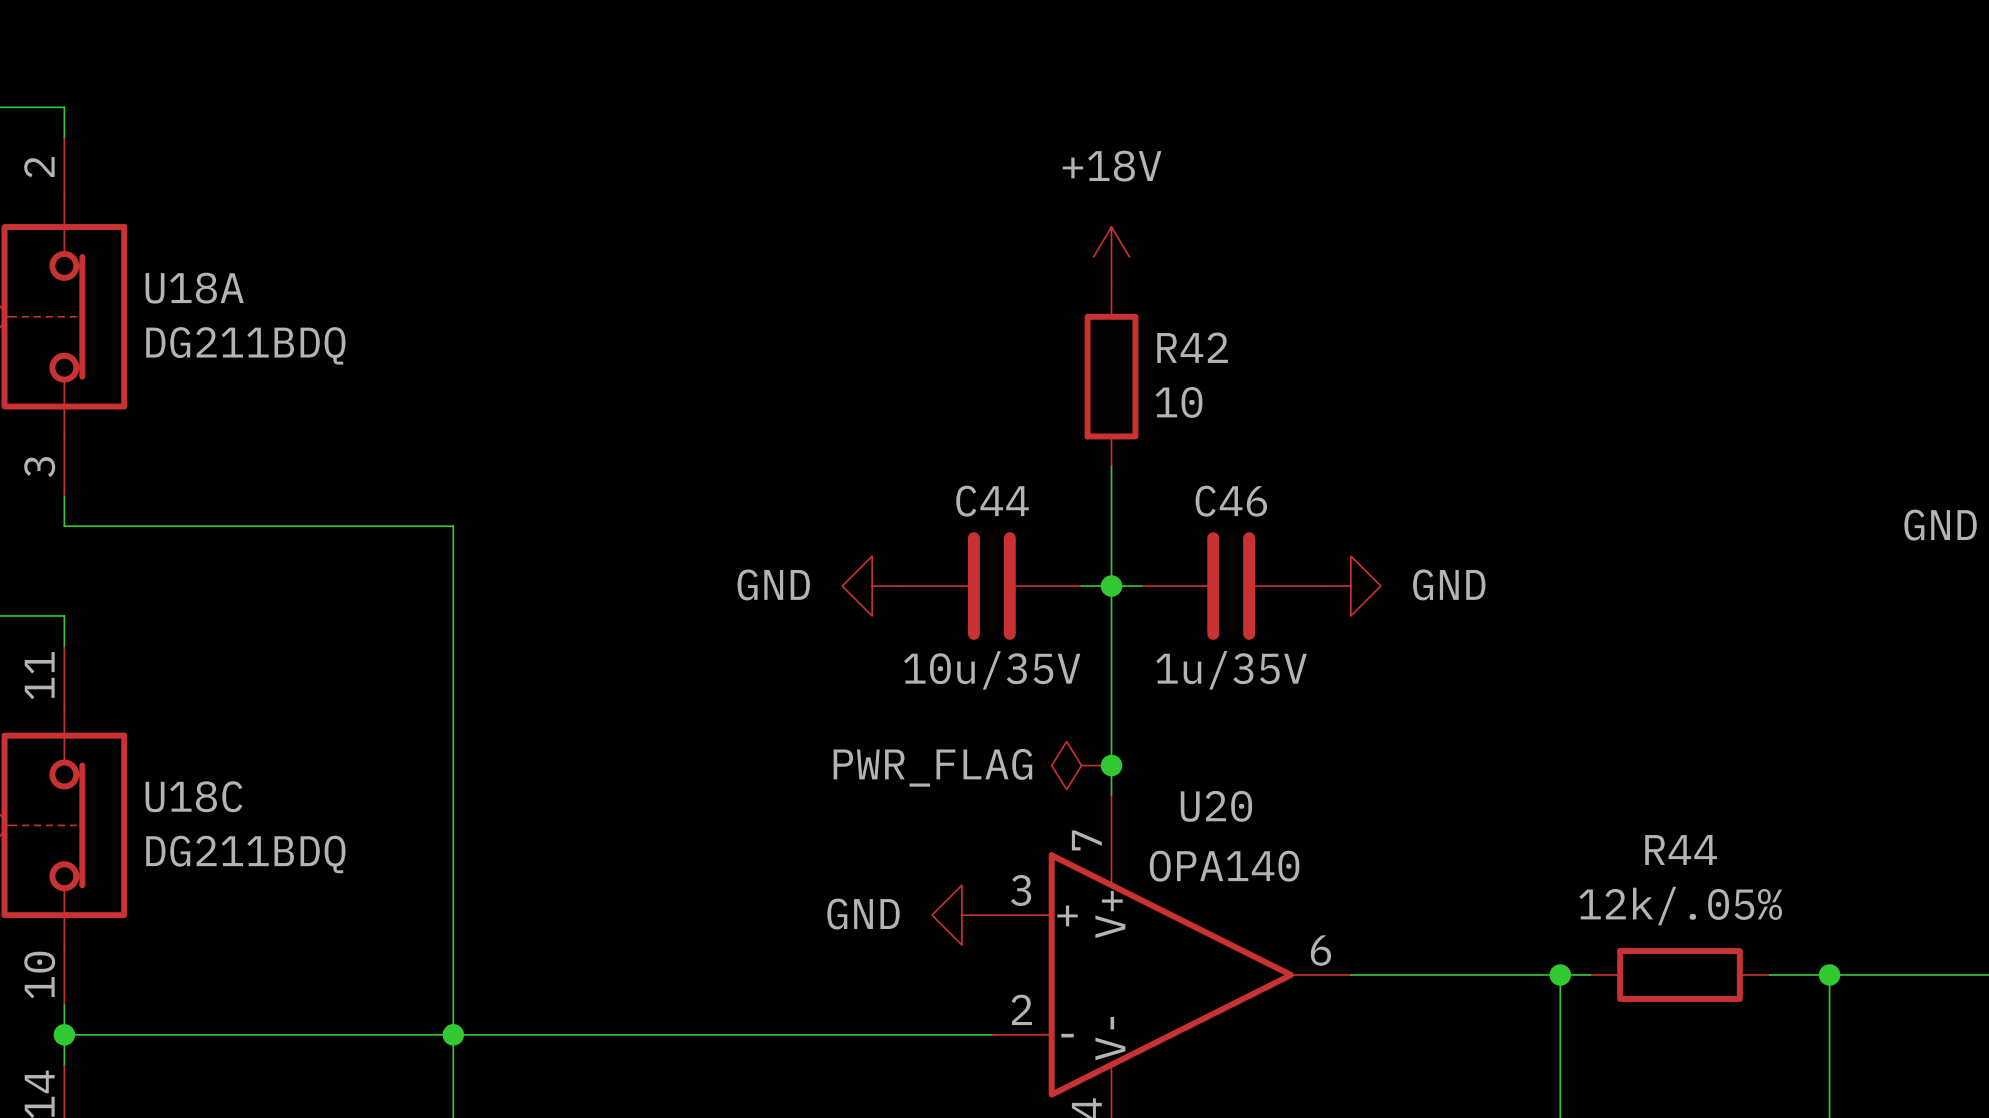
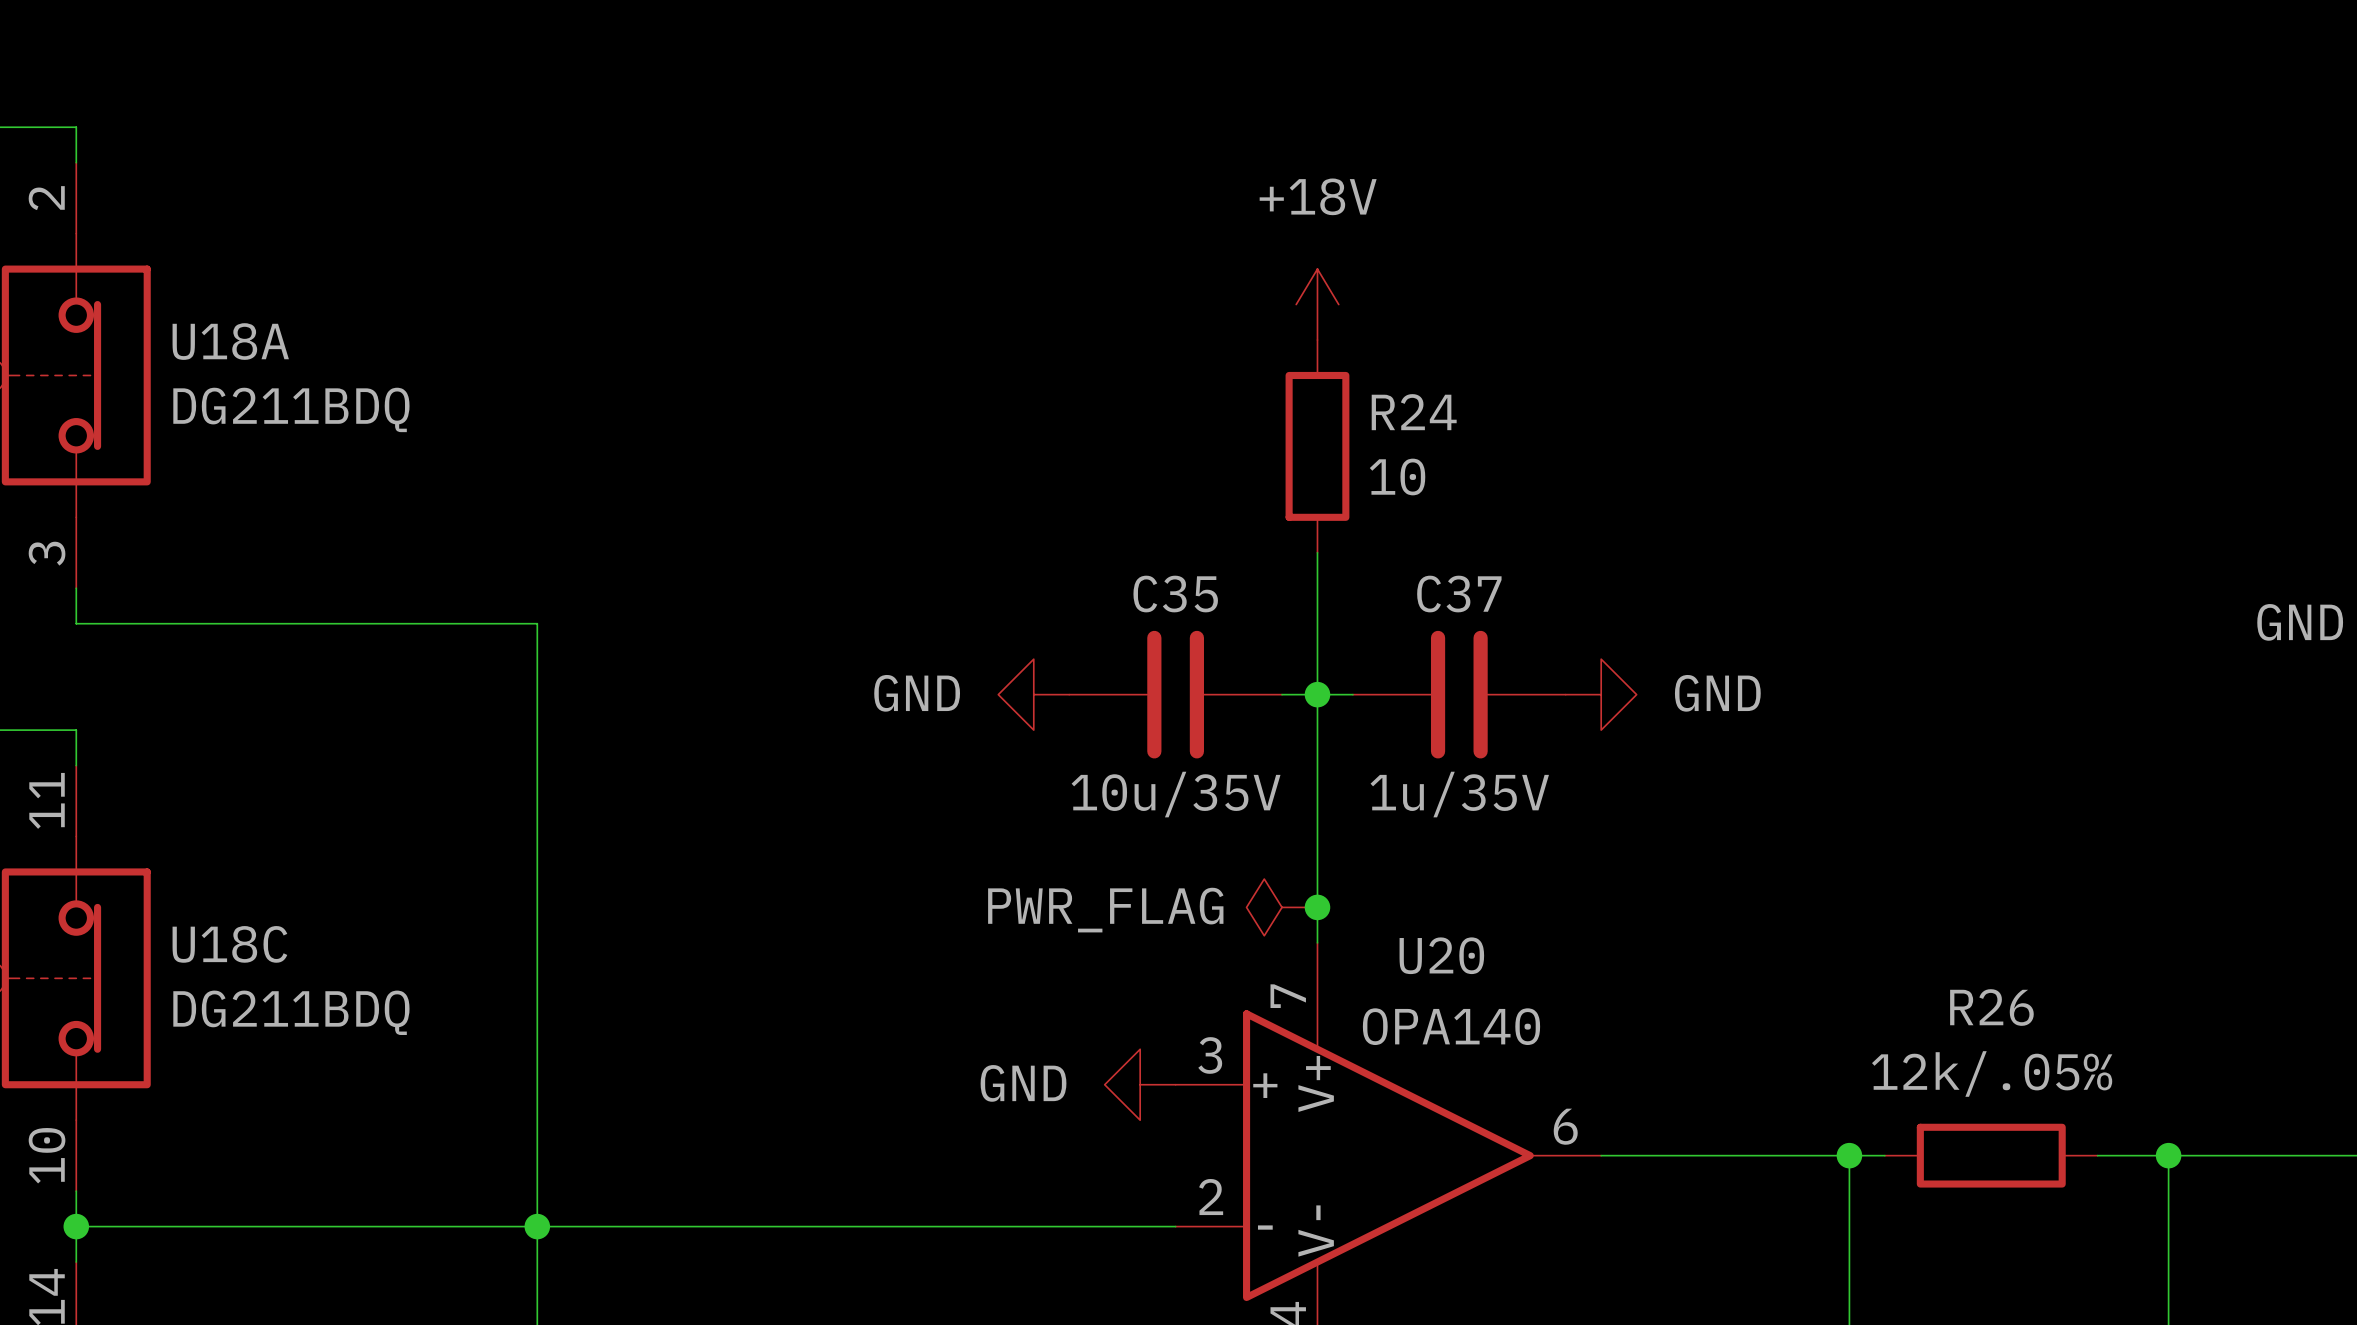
R42 name: R42 (1192, 347) -> R24 (1414, 412)
C44 name: C44 (992, 501) -> C35 (1175, 594)
C46 name: C46 (1231, 501) -> C37 (1459, 594)
R44 name: R44 (1681, 850) -> R26 (1991, 1007)

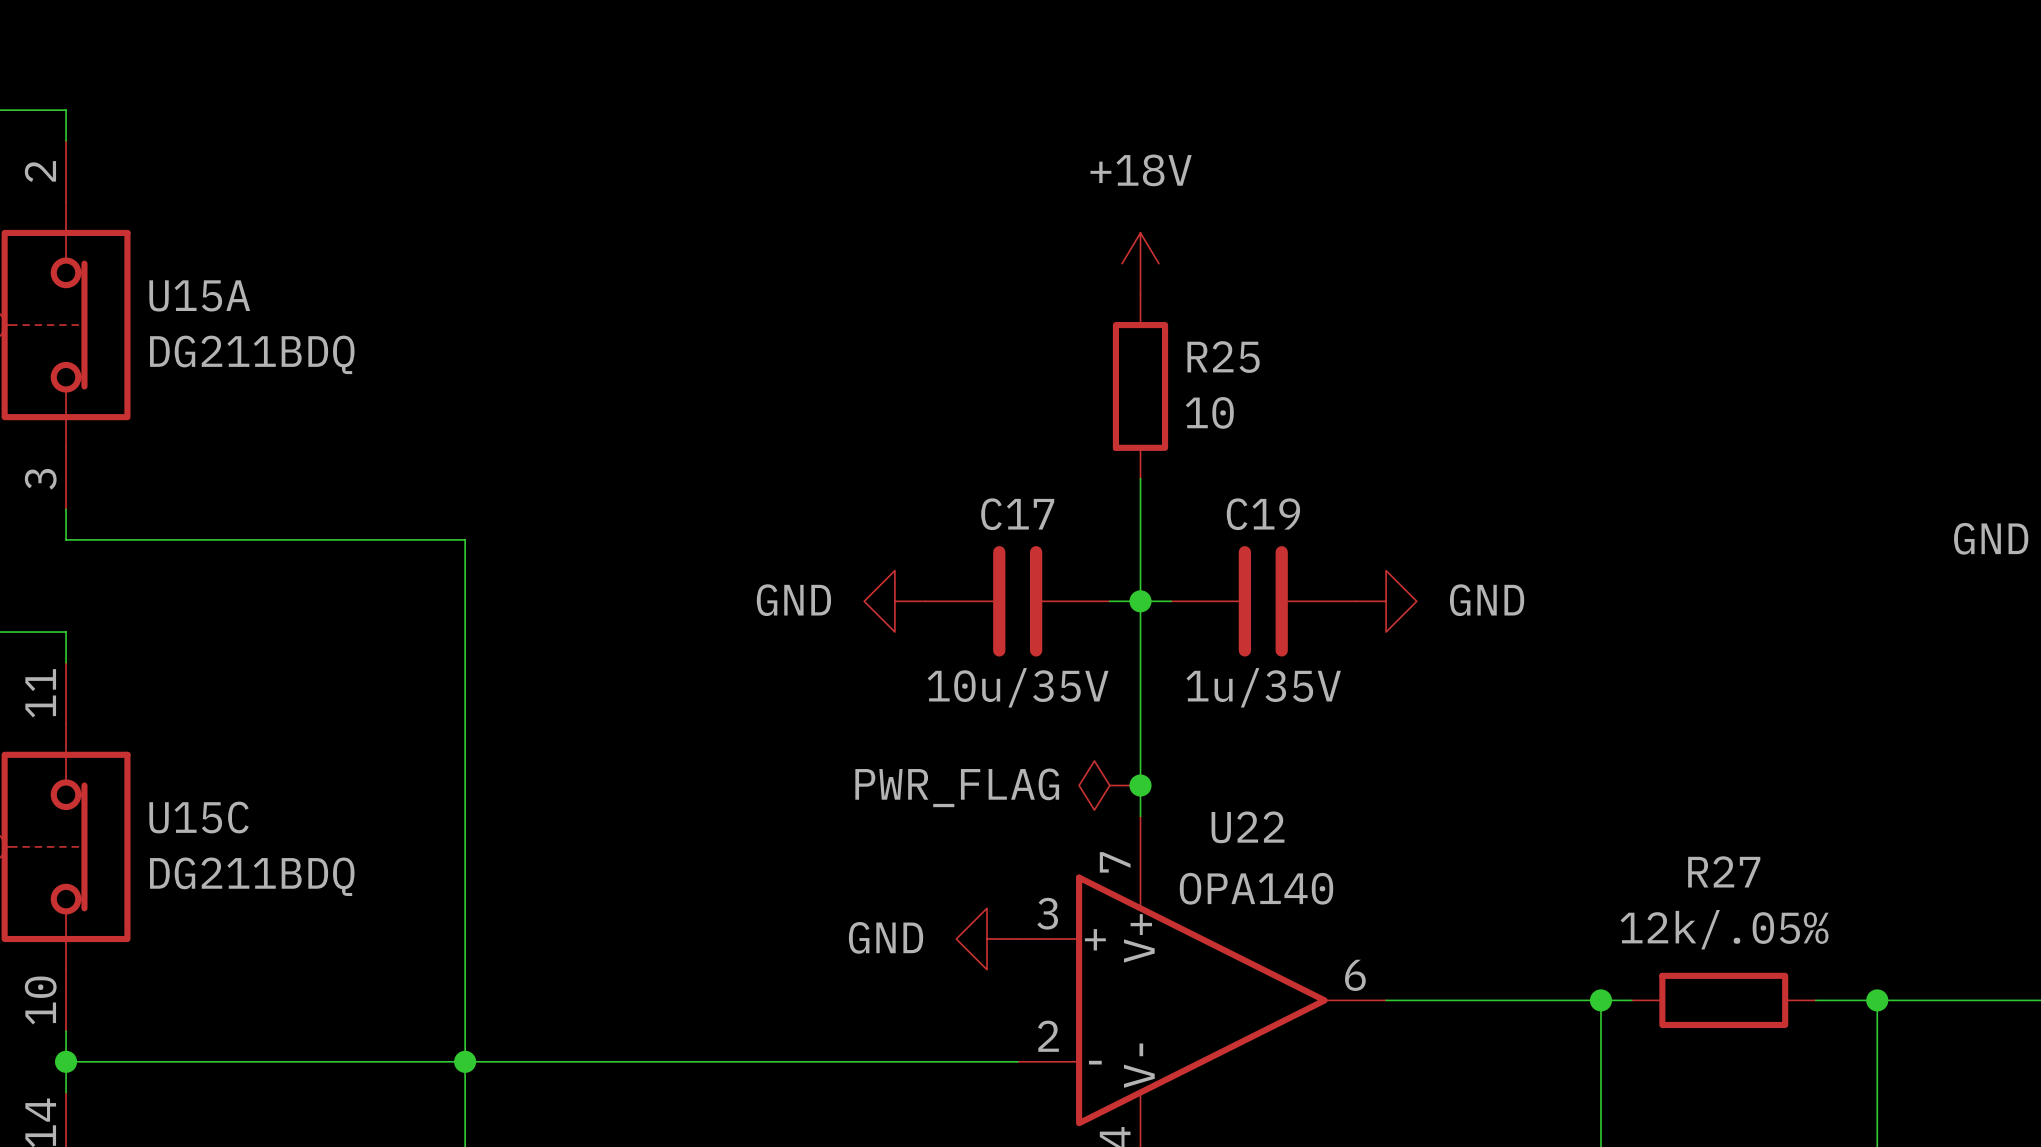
U18A name: U18A (230, 341) -> U15A (199, 295)
R24 name: R24 (1414, 412) -> R25 (1223, 357)
C35 name: C35 (1175, 594) -> C17 (1017, 514)
C37 name: C37 (1459, 594) -> C19 (1263, 514)
U18C name: U18C (229, 944) -> U15C (199, 817)
U20 name: U20 (1441, 955) -> U22 (1247, 827)
R26 name: R26 (1991, 1007) -> R27 (1724, 871)

